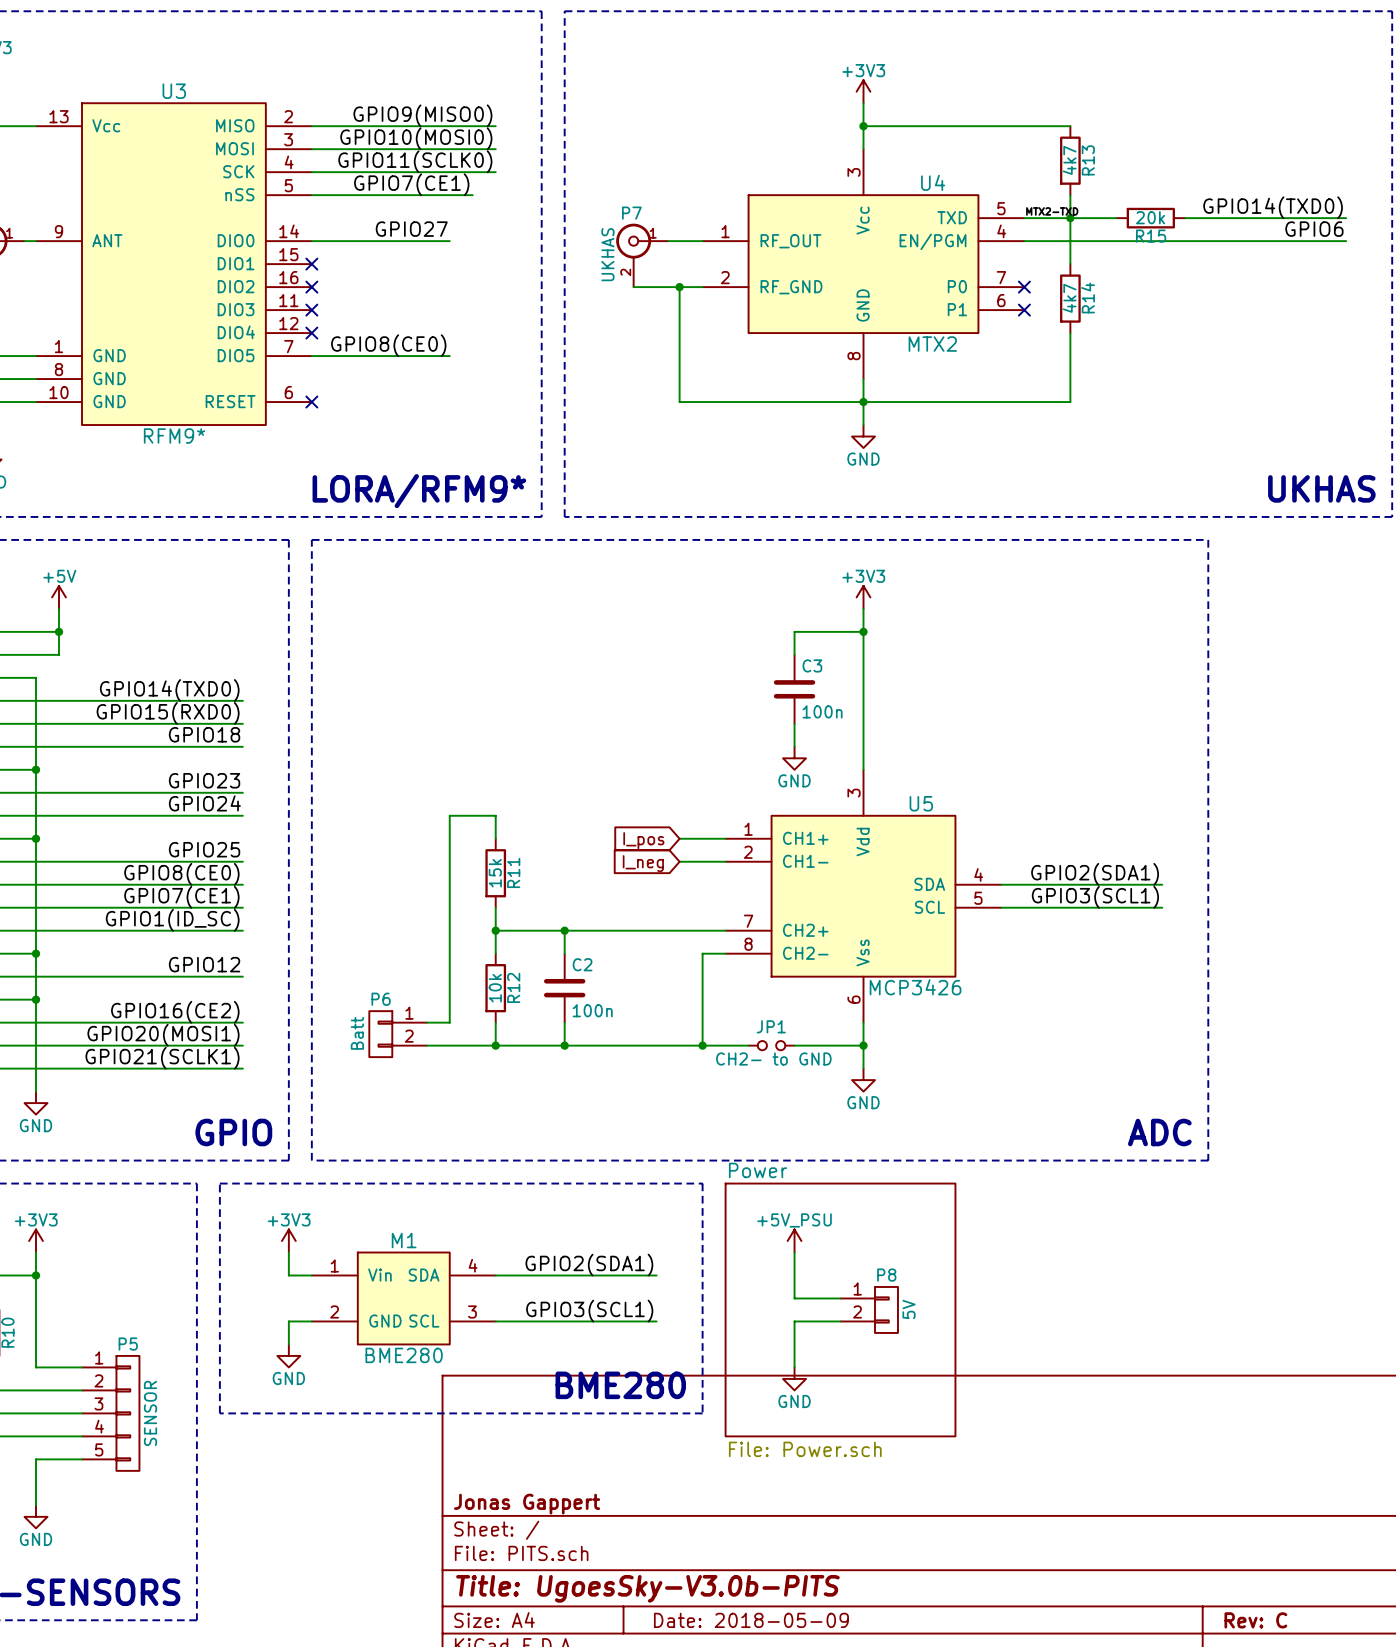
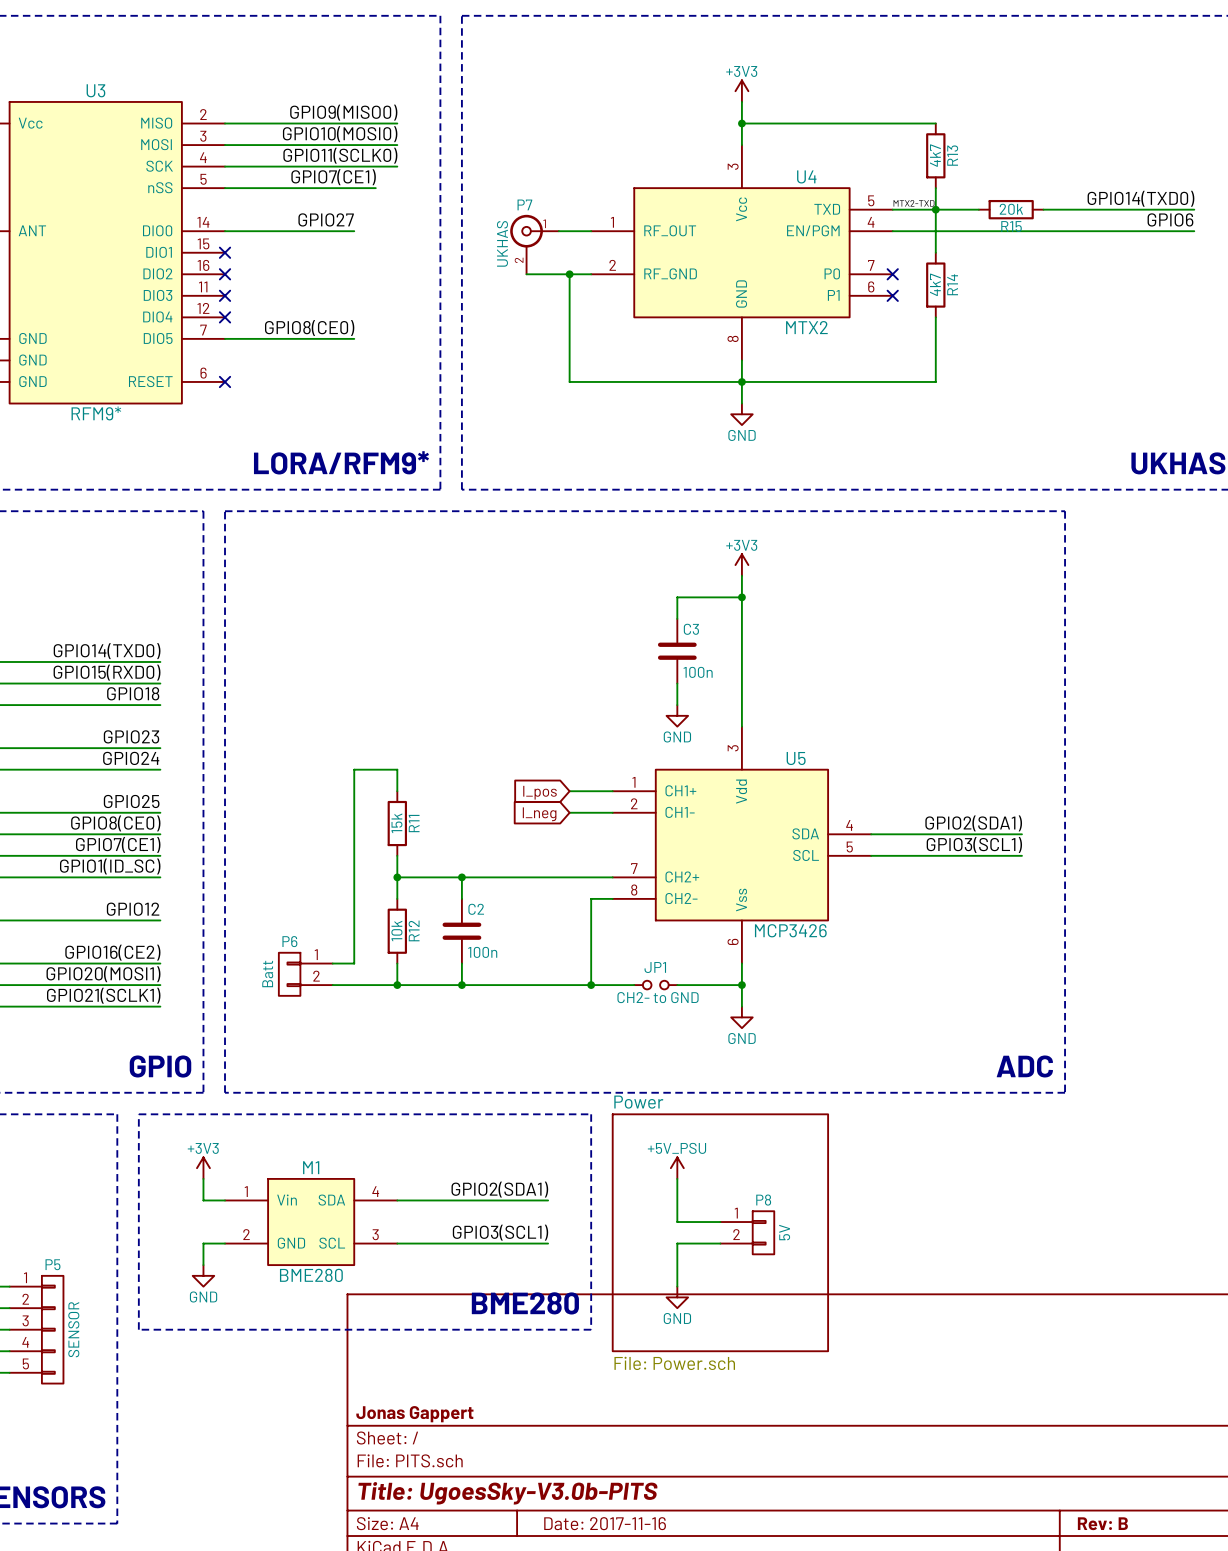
title block: Date: 2018-05-09 (751, 1620) -> Date: 2017-11-16 (605, 1523)
title block: Rev: C (1255, 1620) -> Rev: B (1102, 1523)

